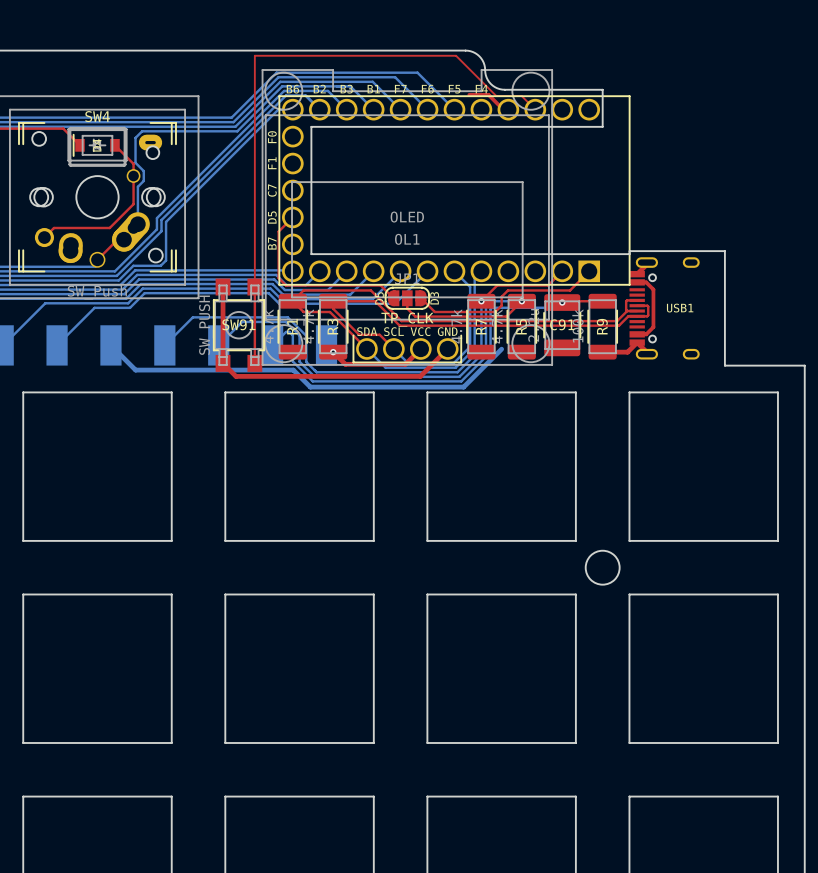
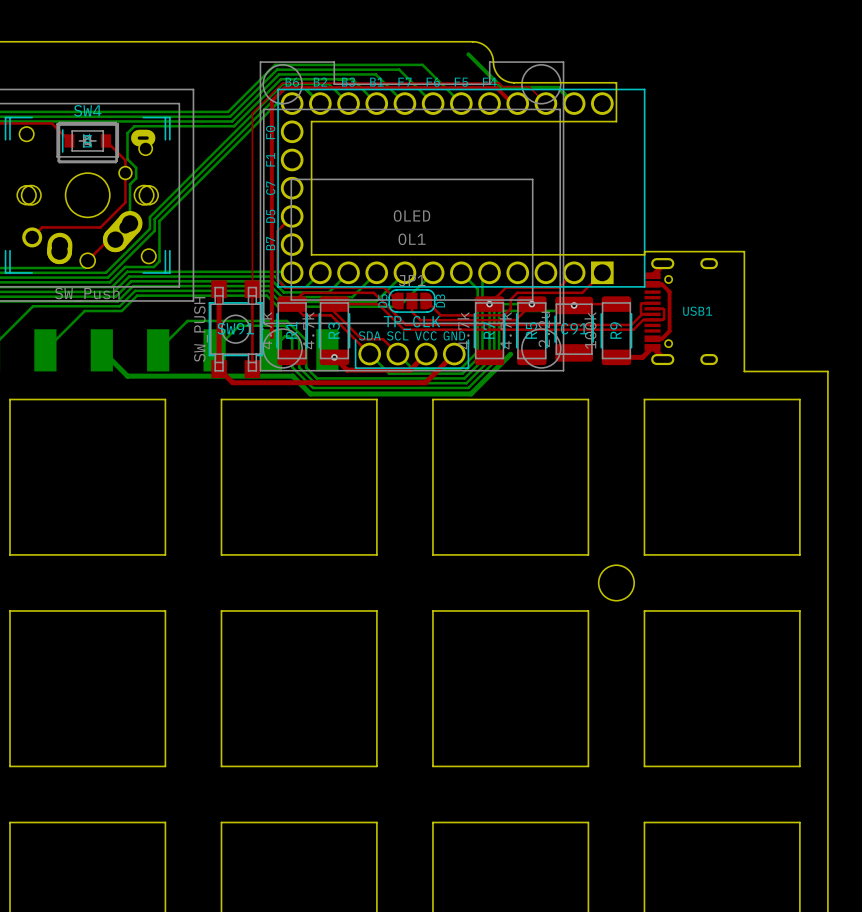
bottom track: none -> (468, 54) (501, 87) (558, 87) (574, 103)
top track: none -> (475, 89) (476, 88) (284, 88) (271, 100) (271, 337)
top track: (521, 96) (496, 96) (456, 55) (254, 55) (254, 118) -> (531, 89) (529, 86) (502, 86) (499, 83) (282, 83) (252, 113)

